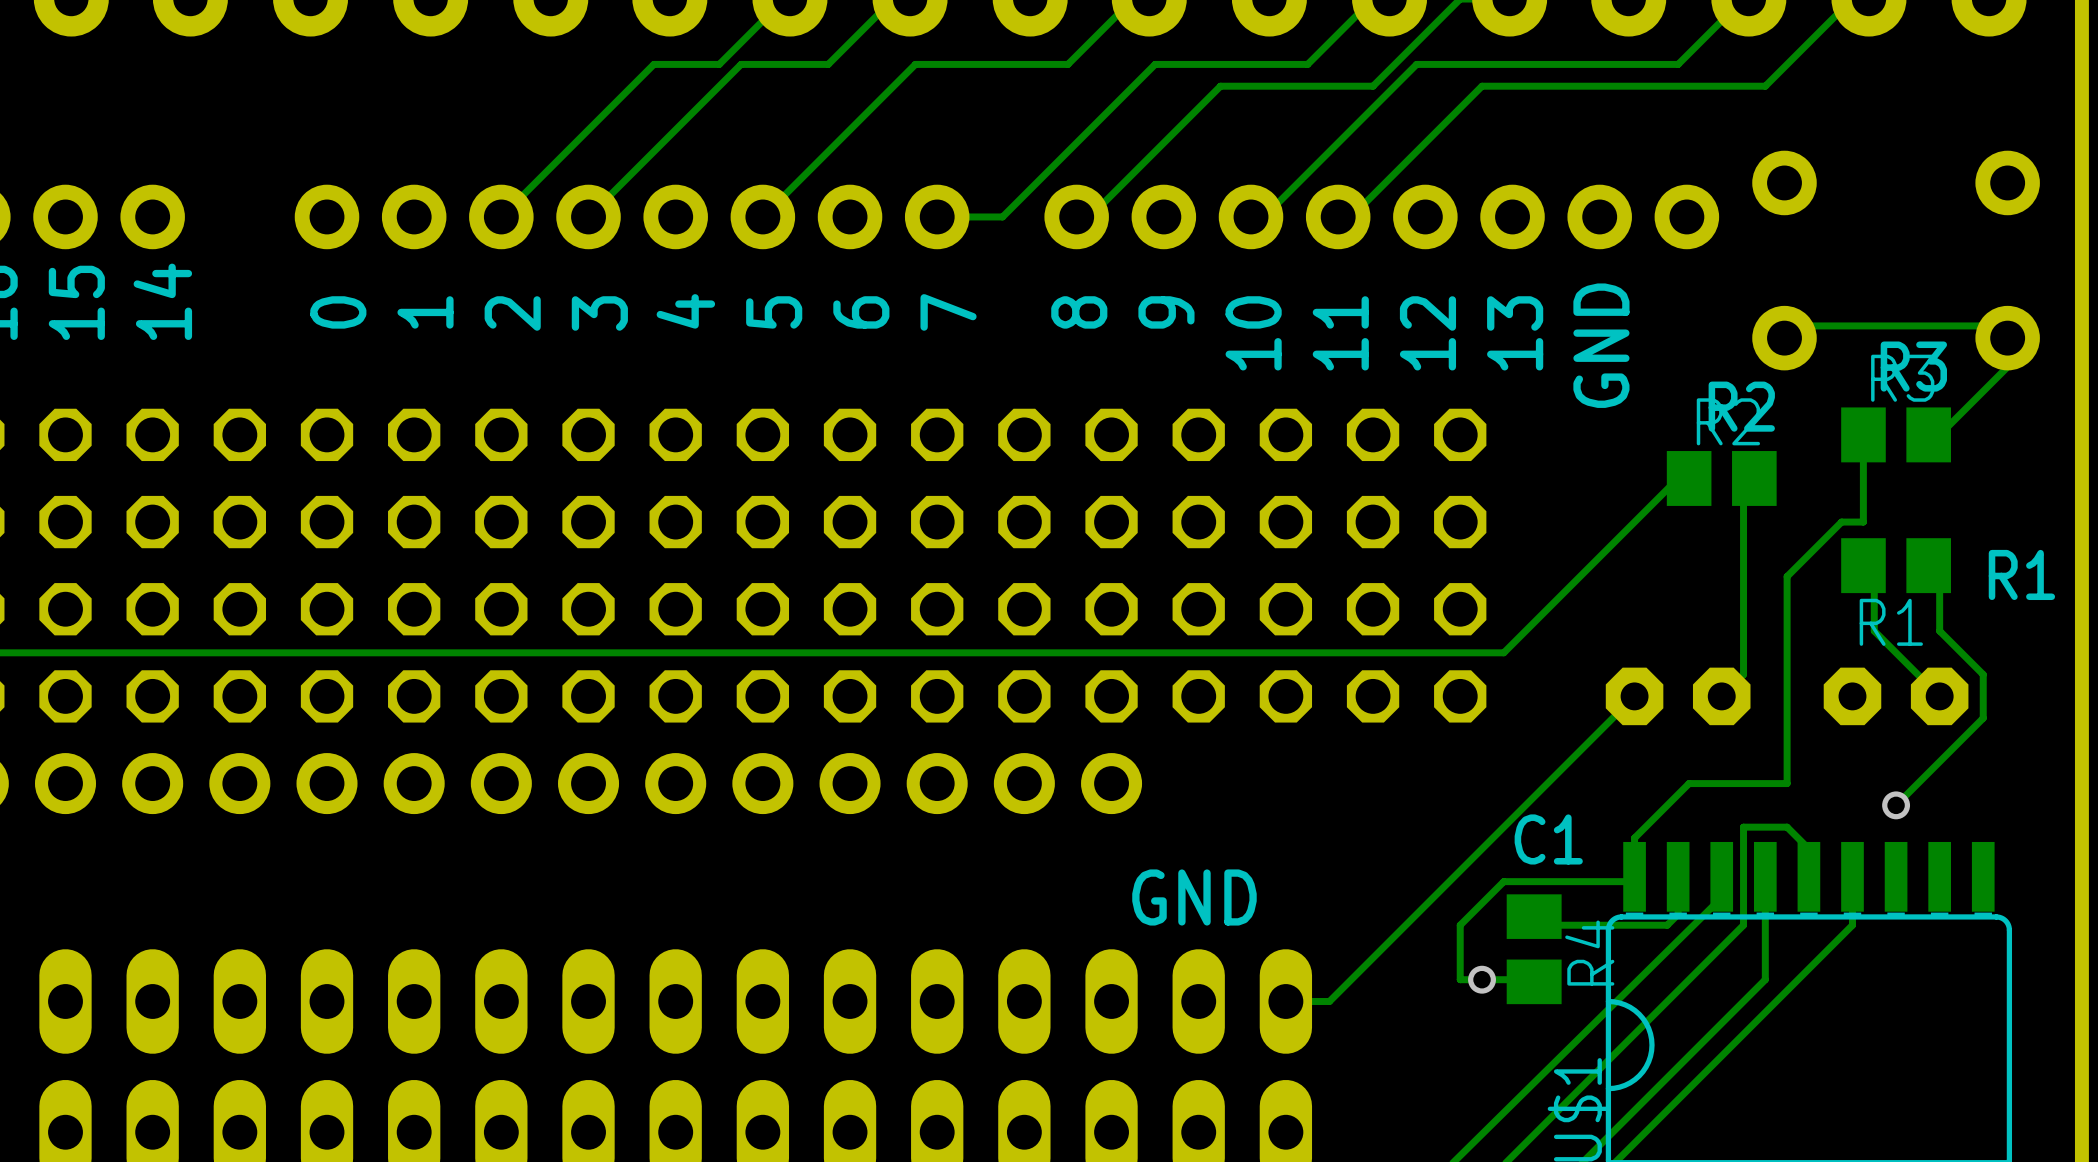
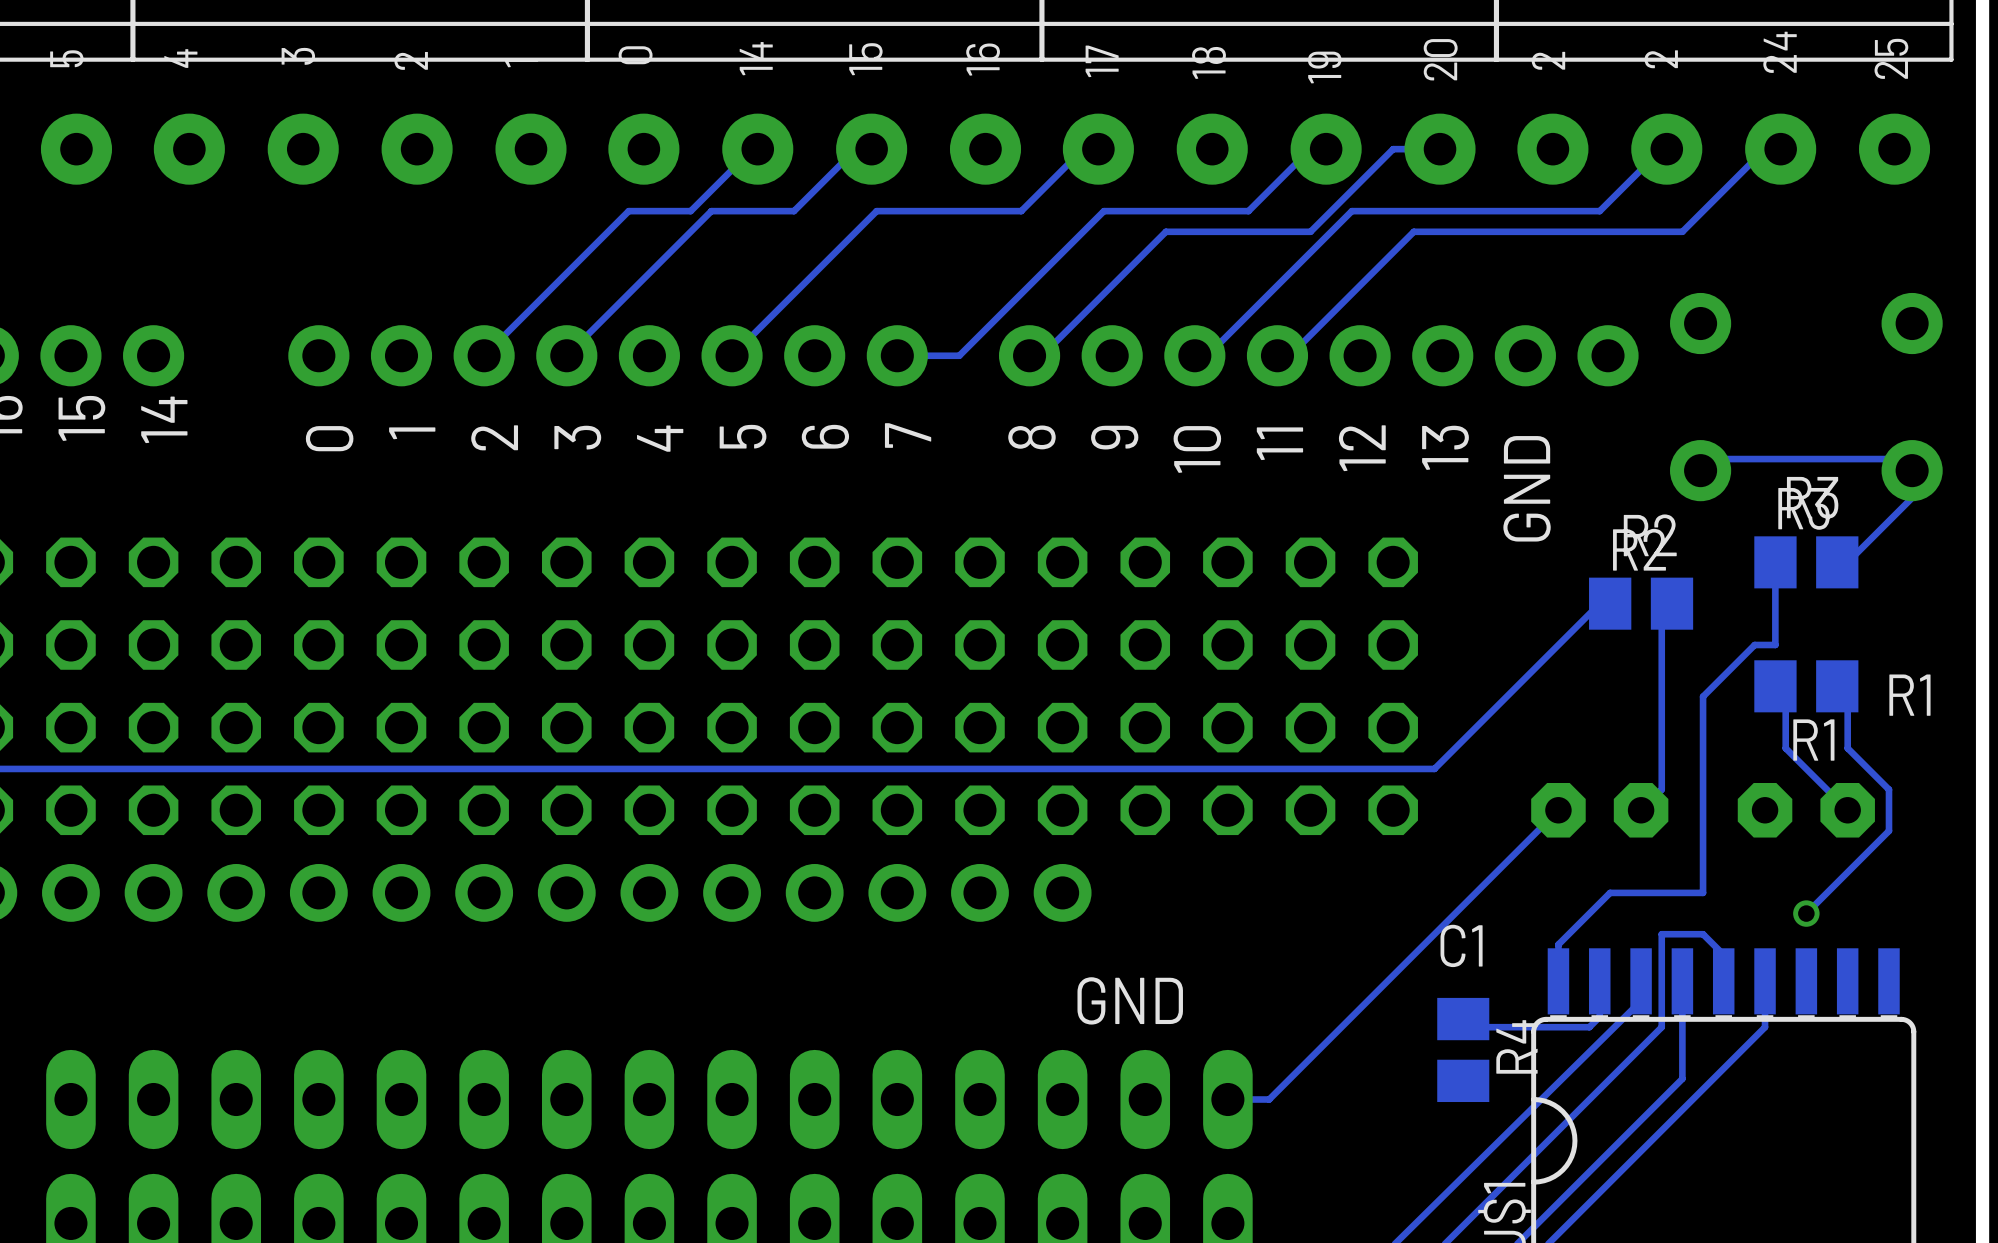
track: (1634, 876) (1634, 881) (1503, 881) (1460, 925) (1460, 979) (1525, 979) (1534, 981) -> none
via: (1482, 979) -> none

